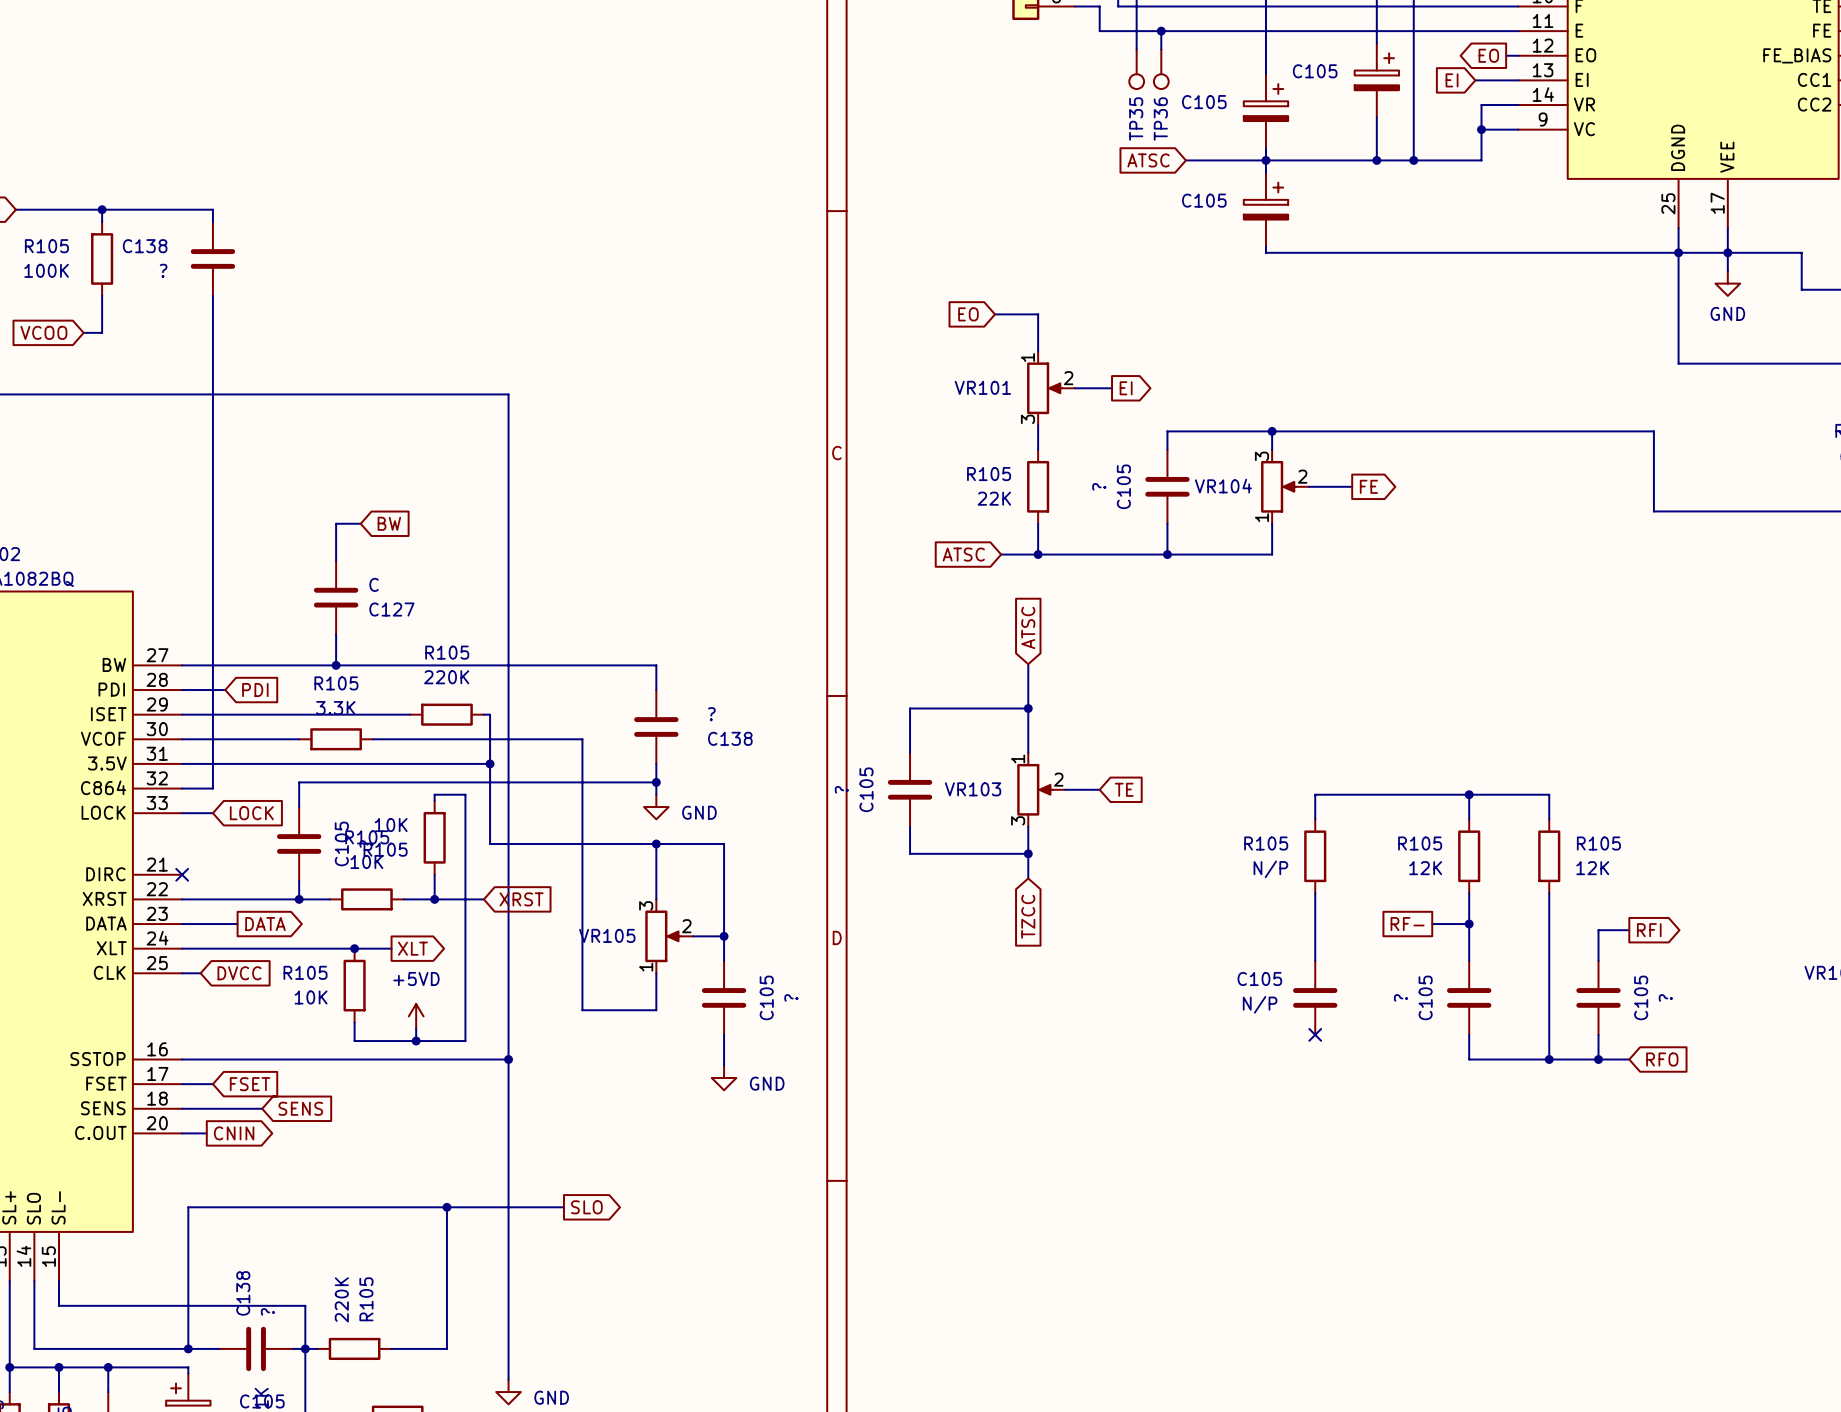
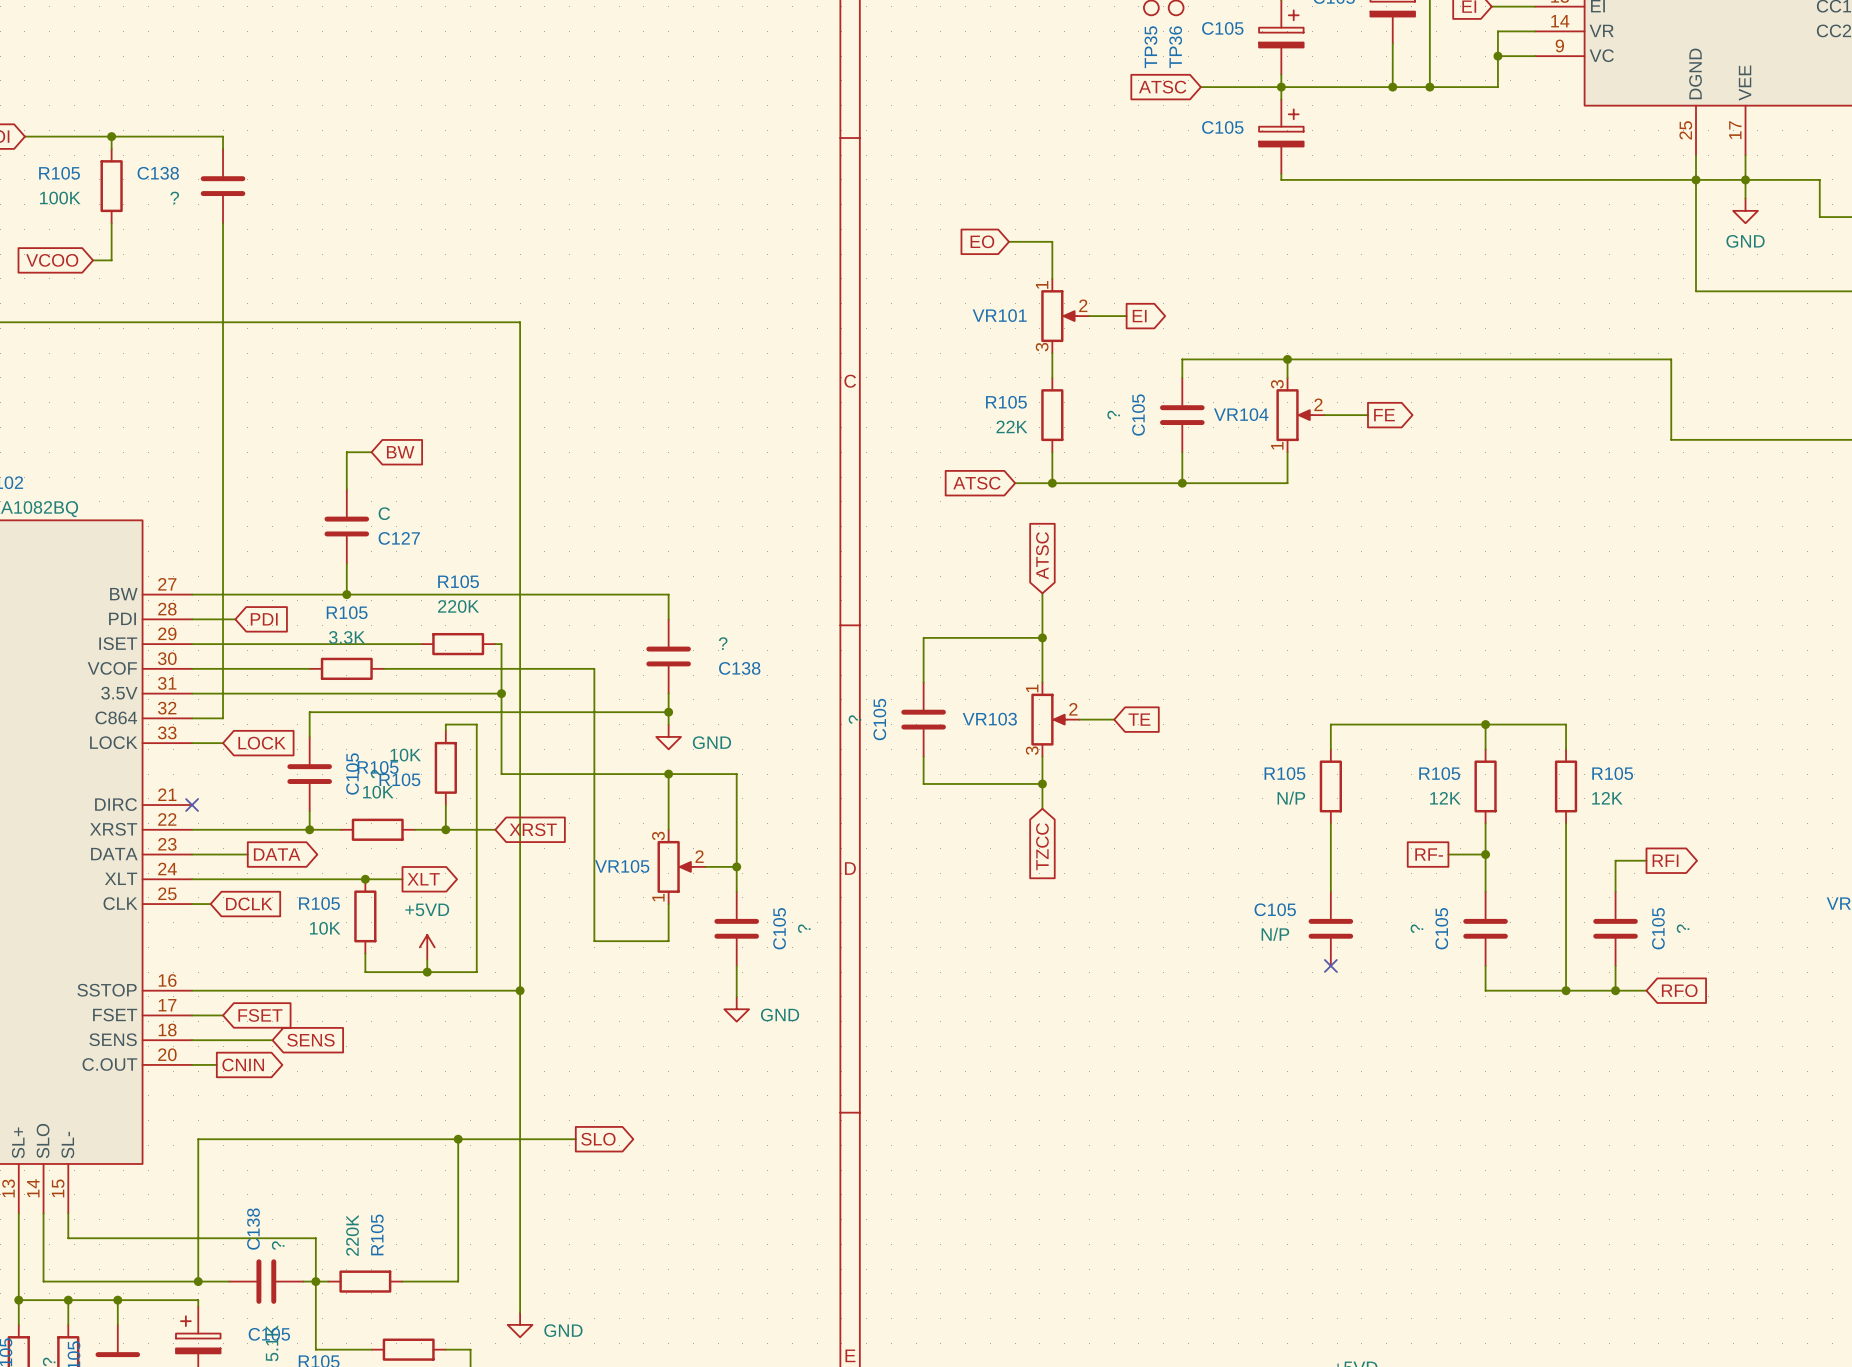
global label: DVCC (239, 973) -> DCLK (249, 904)

